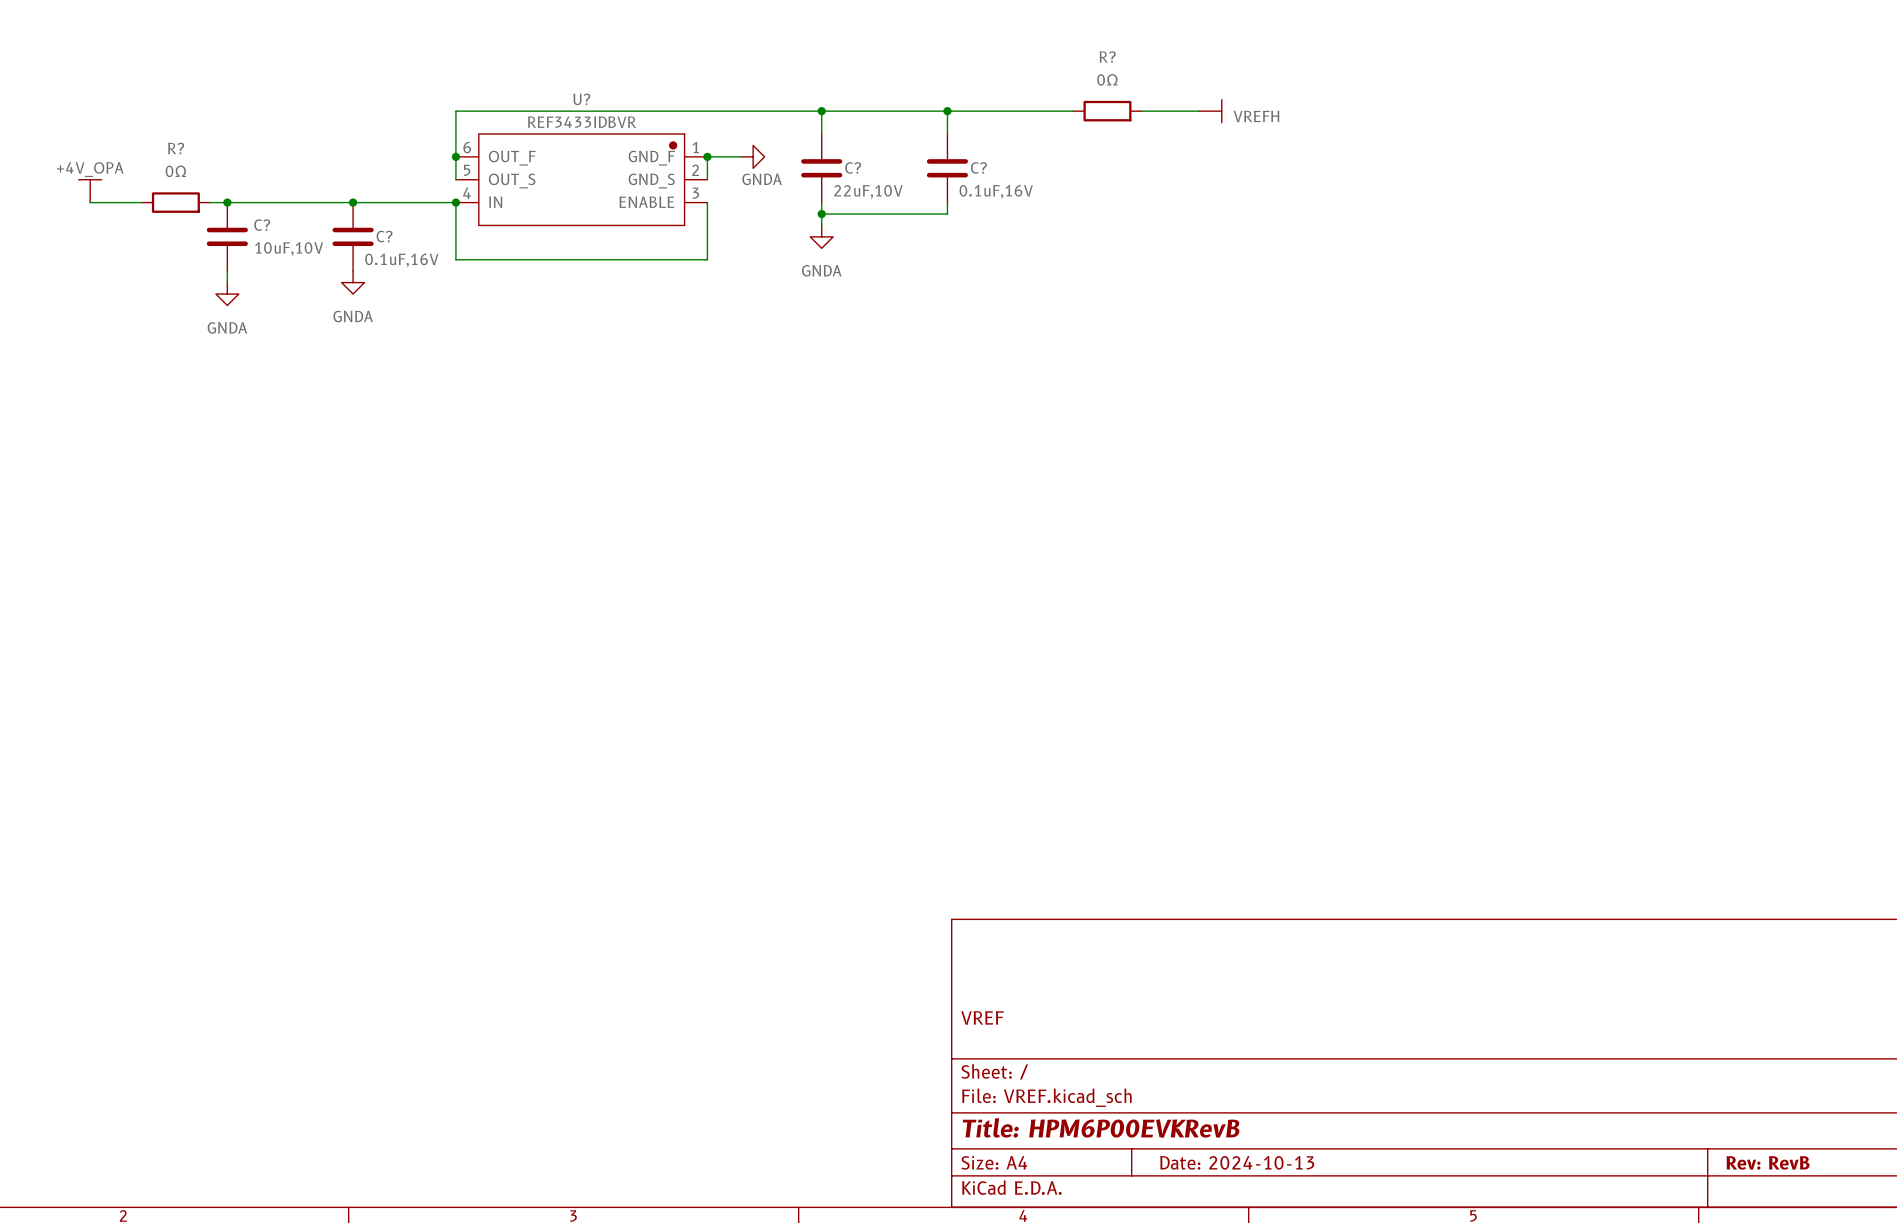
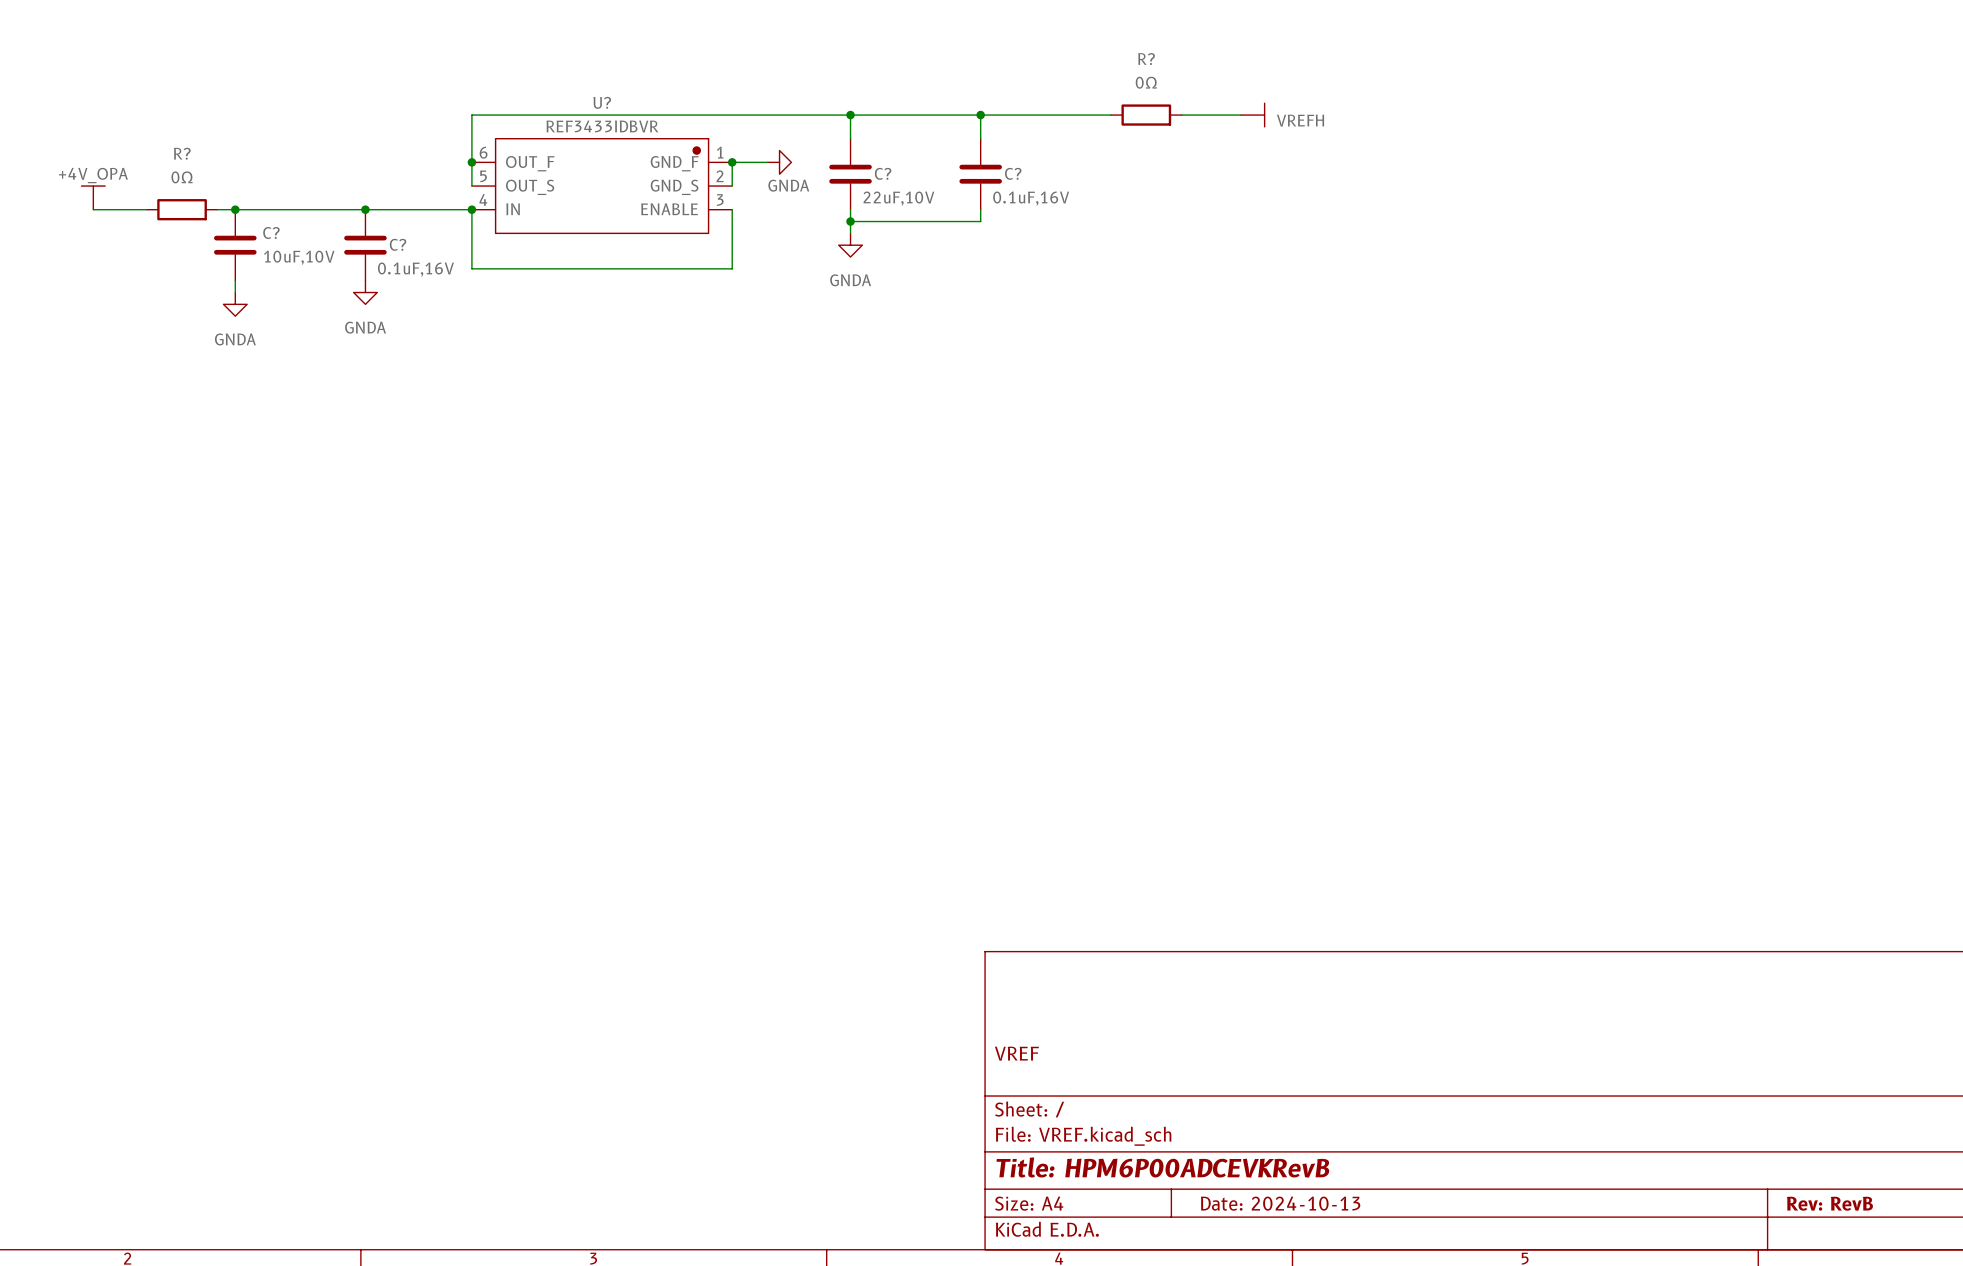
title block: Title: HPM6P00EVKRevB (1101, 1127) -> Title: HPM6P00ADCEVKRevB (1162, 1167)

